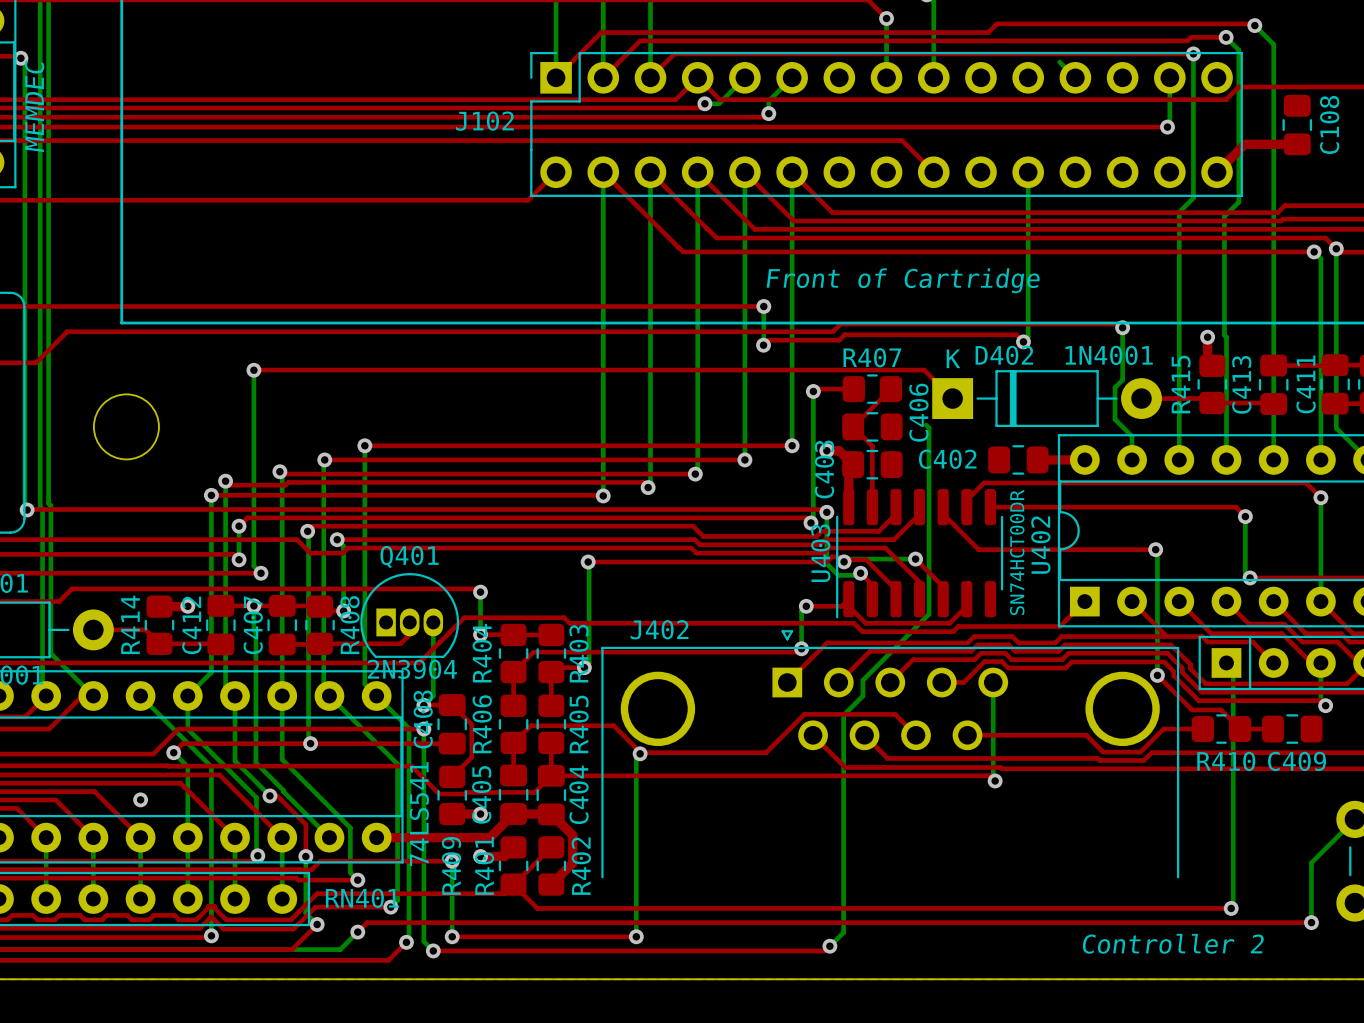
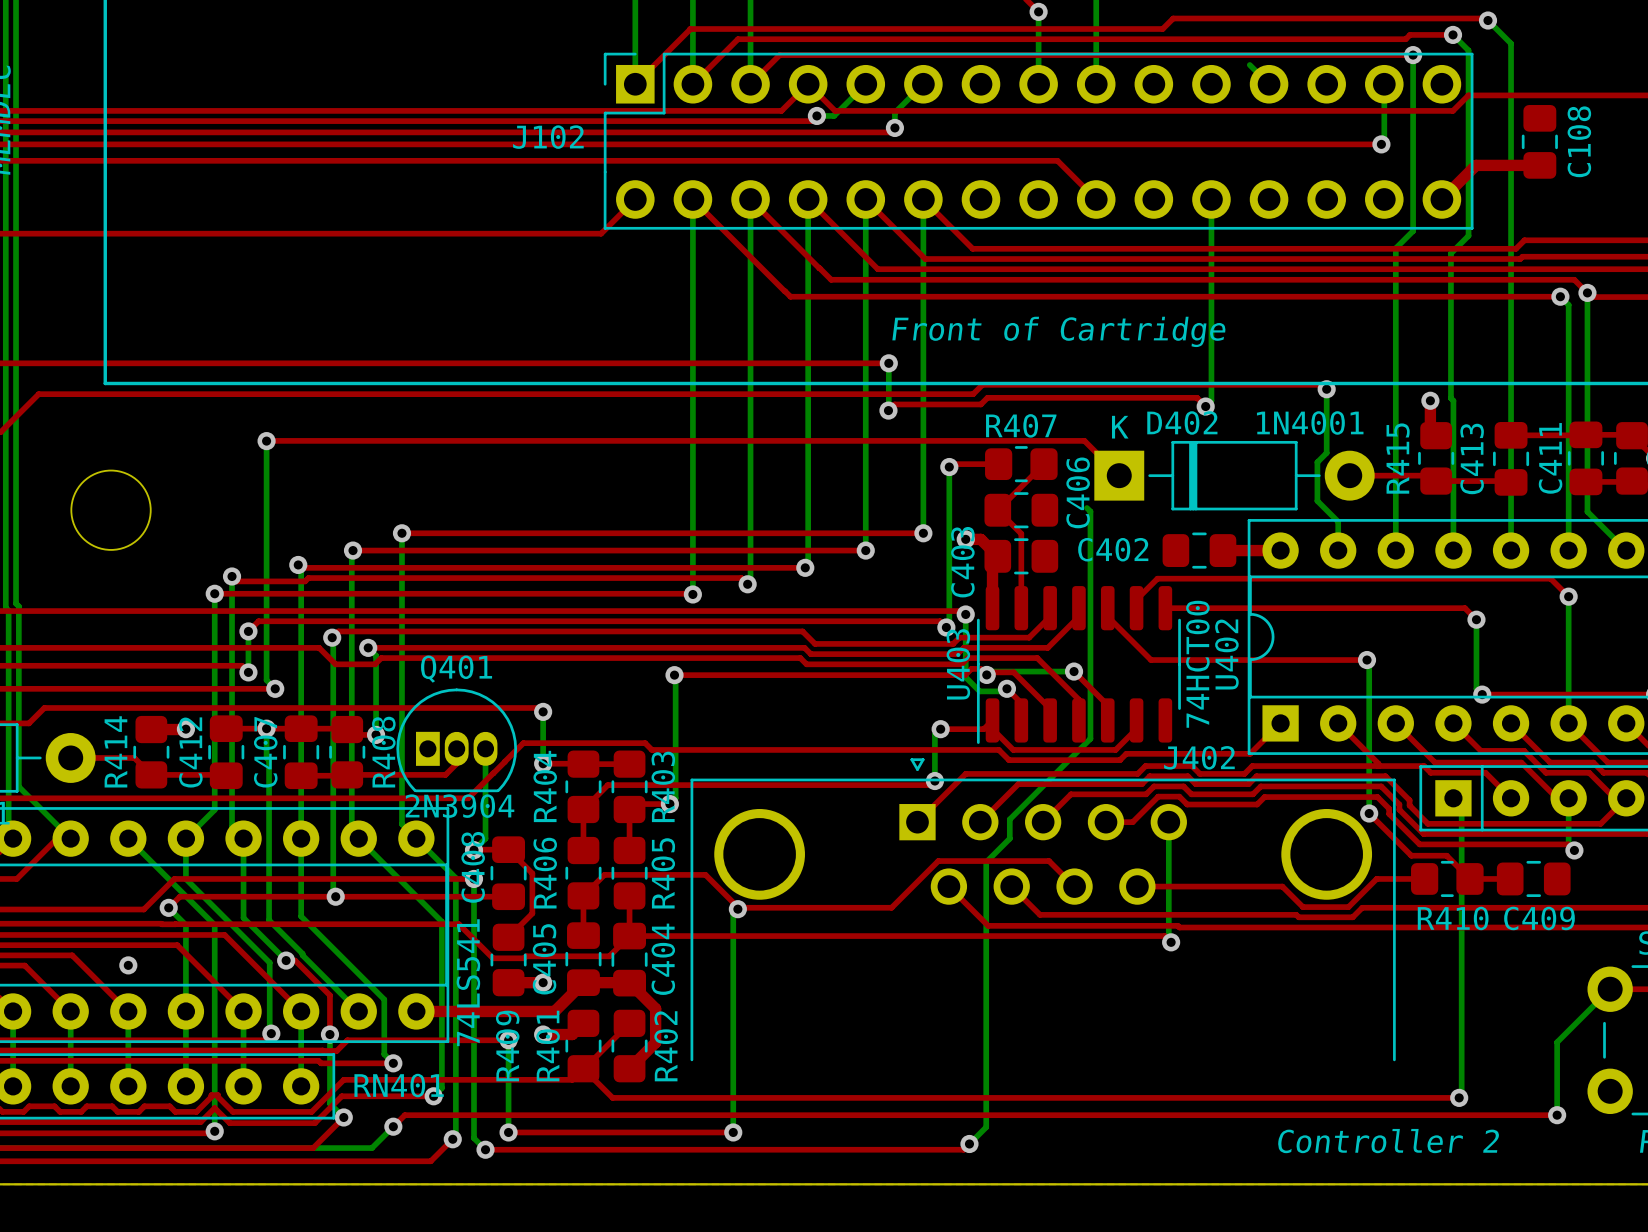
U403 value: SN74HCT00DR (1017, 552) -> 74HCT00 (1197, 664)
J402 name position: J402 (659, 629) -> J402 (1199, 757)

